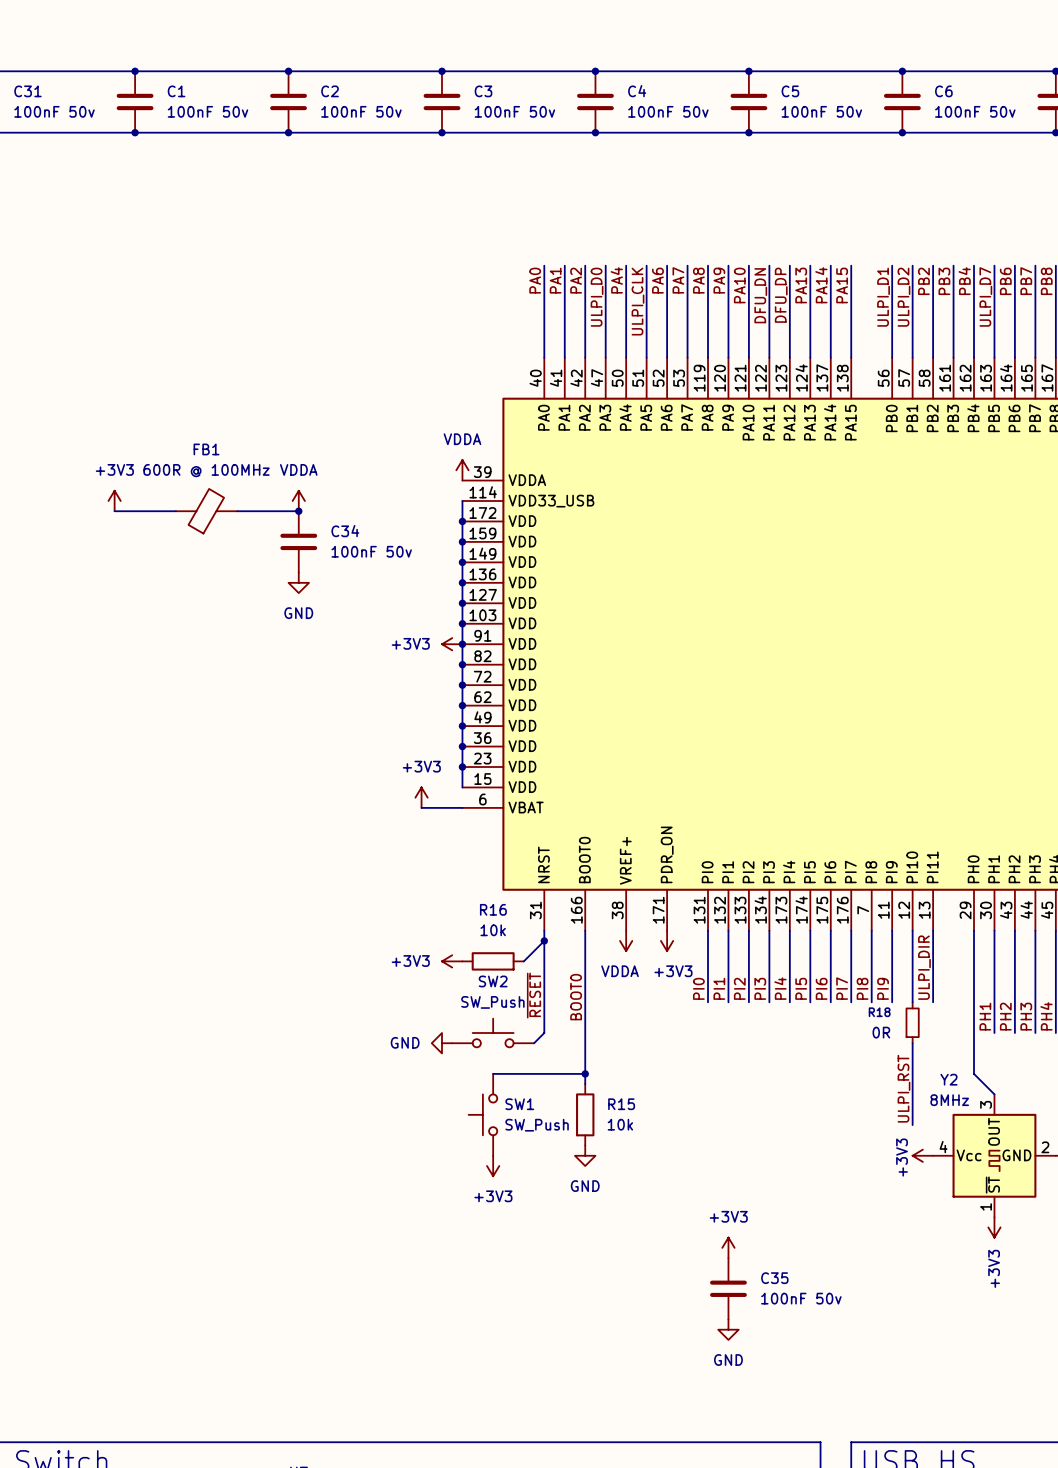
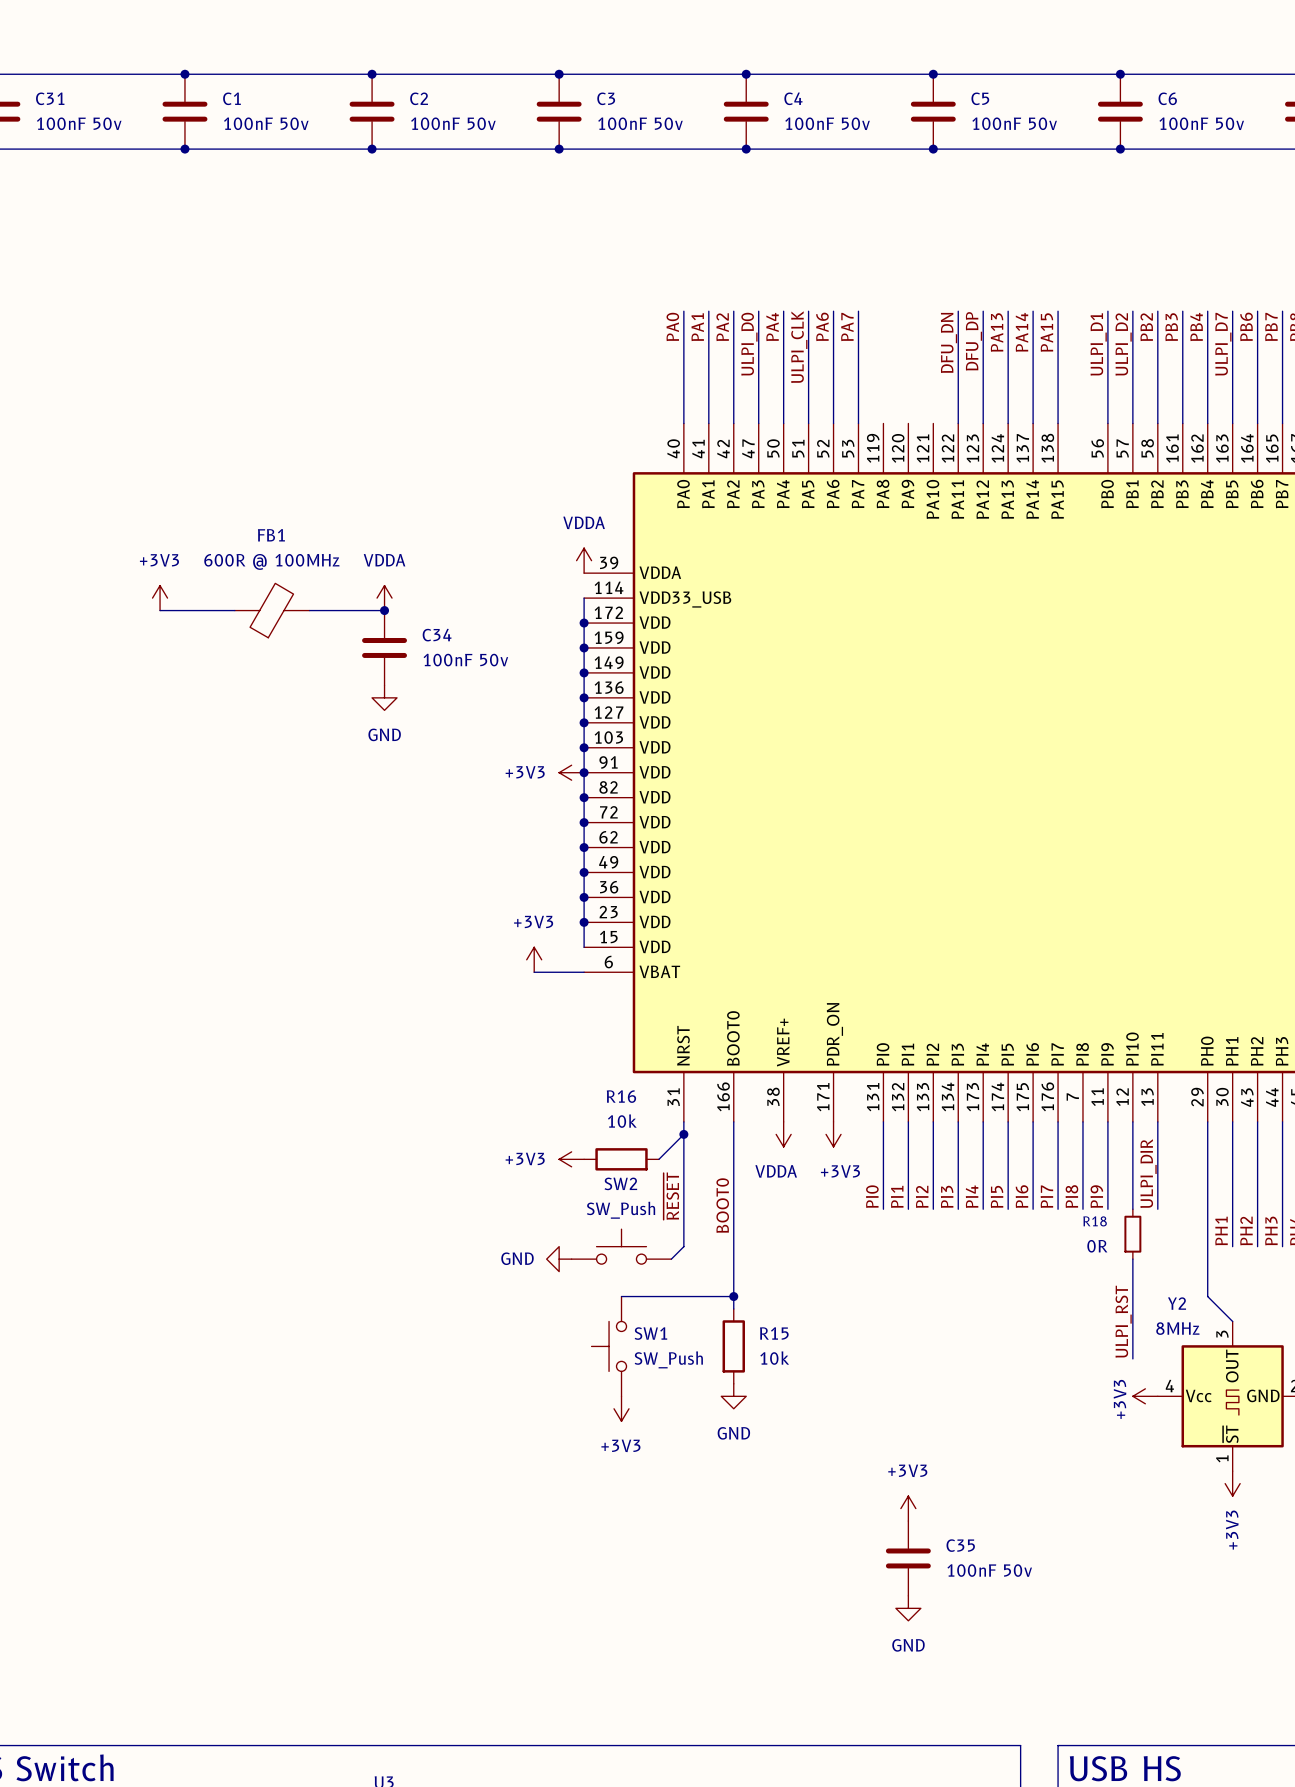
wire: (708, 265) (708, 357) -> none
wire: (728, 265) (728, 357) -> none
wire: (748, 265) (748, 357) -> none
label: PA8 (698, 280) -> none
label: PA9 (719, 280) -> none
label: PA10 (739, 285) -> none

